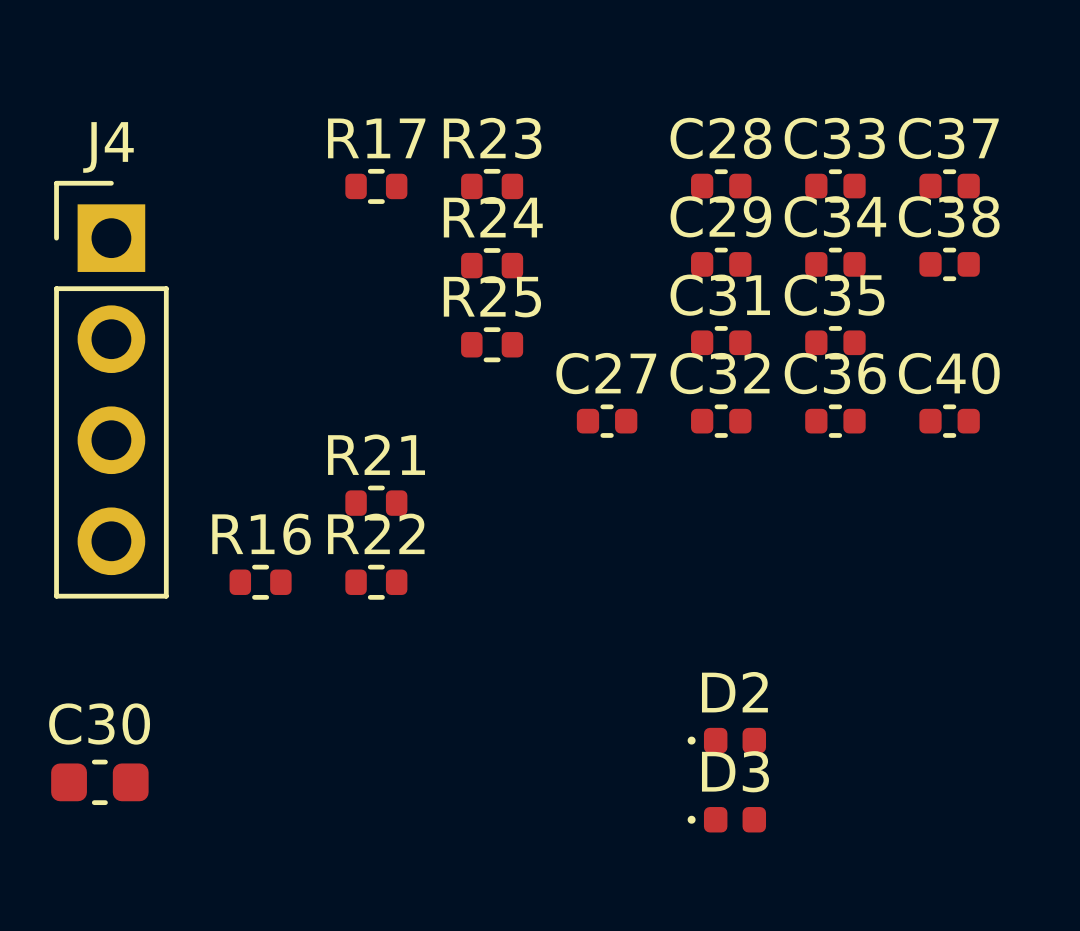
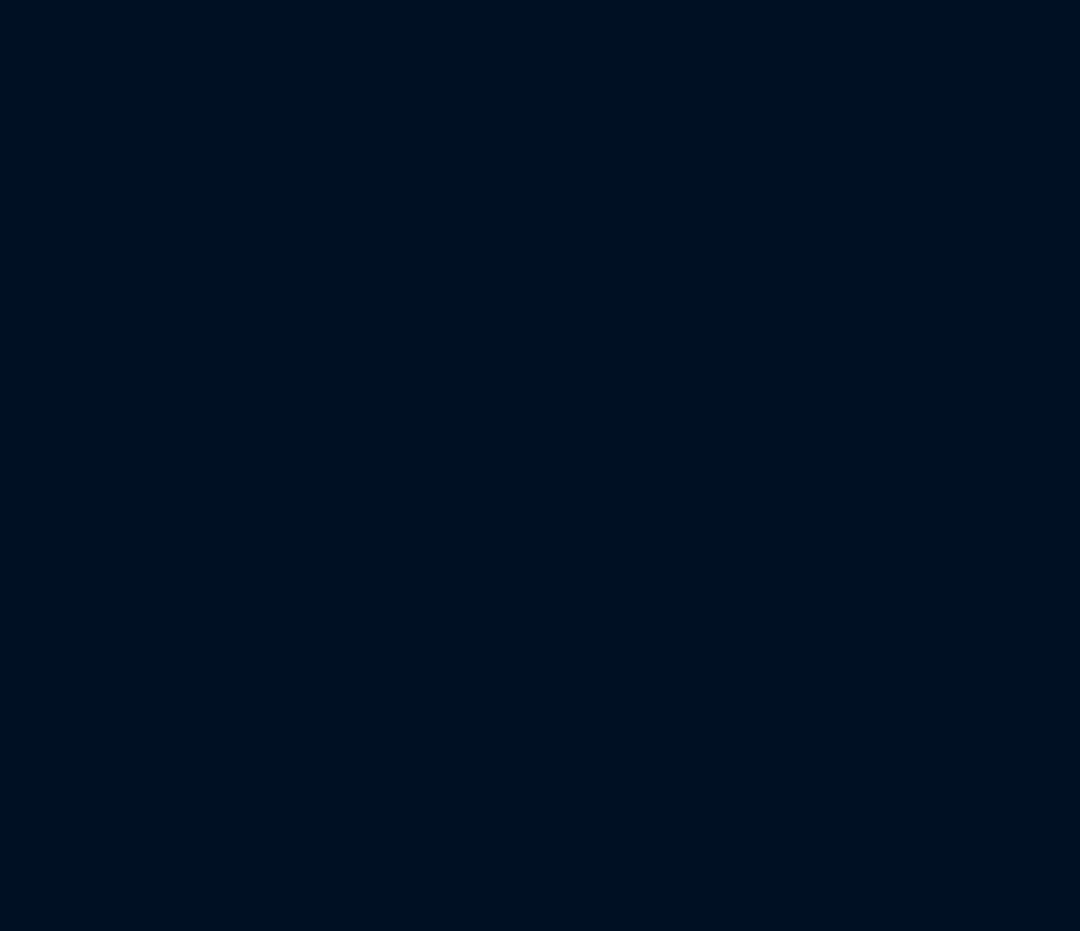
R17: (376, 186) -> none
R23: (492, 186) -> none
C28: (721, 186) -> none
C33: (835, 186) -> none
C37: (949, 186) -> none
C29: (721, 264) -> none
C34: (835, 264) -> none
C38: (949, 264) -> none
R24: (492, 265) -> none
C31: (721, 342) -> none
C35: (835, 342) -> none
R25: (492, 344) -> none
J4: (111, 389) -> none
C27: (607, 421) -> none
C32: (721, 421) -> none
C36: (835, 421) -> none
C40: (949, 421) -> none
R21: (376, 503) -> none
R16: (260, 582) -> none
R22: (376, 582) -> none
D2: (726, 740) -> none
C30: (99, 782) -> none
D3: (726, 819) -> none

